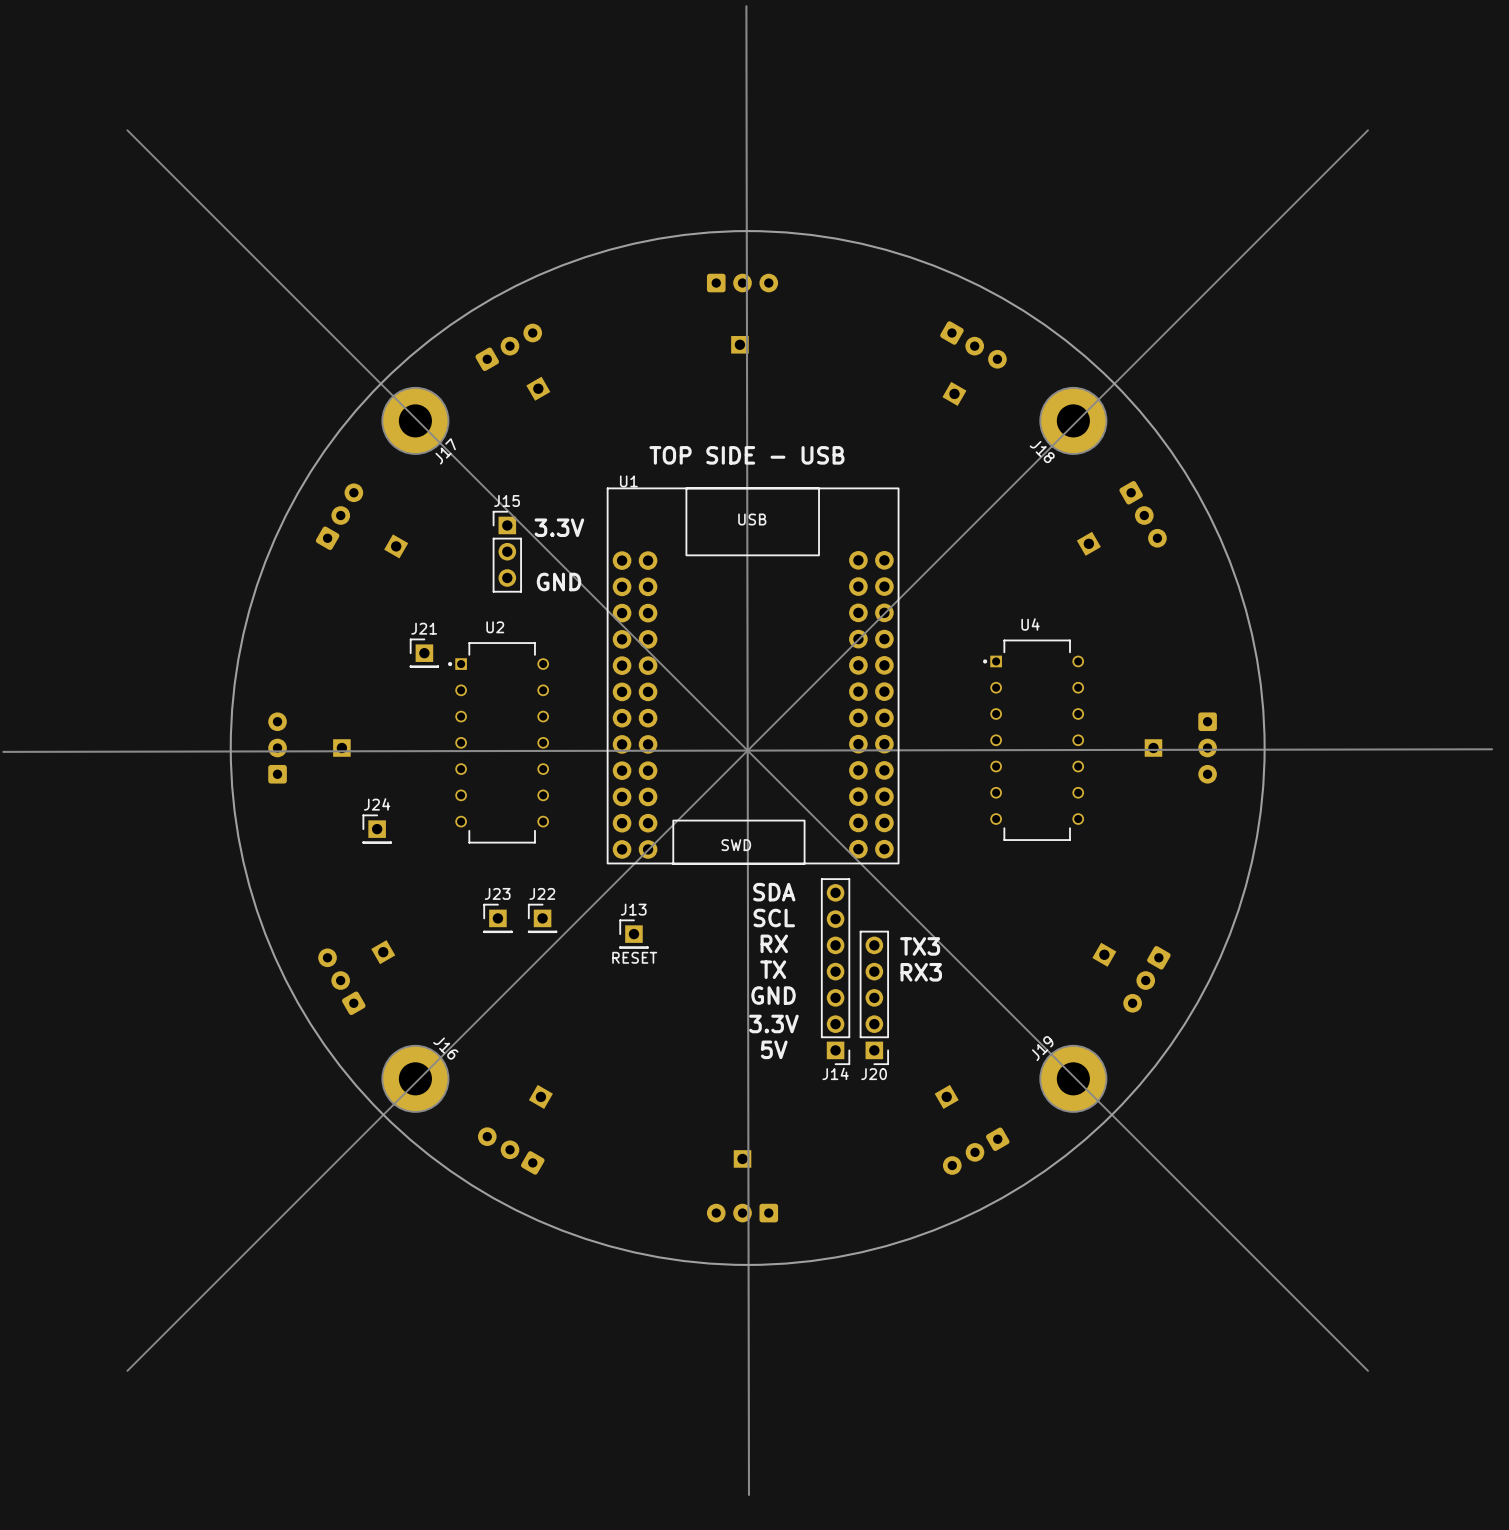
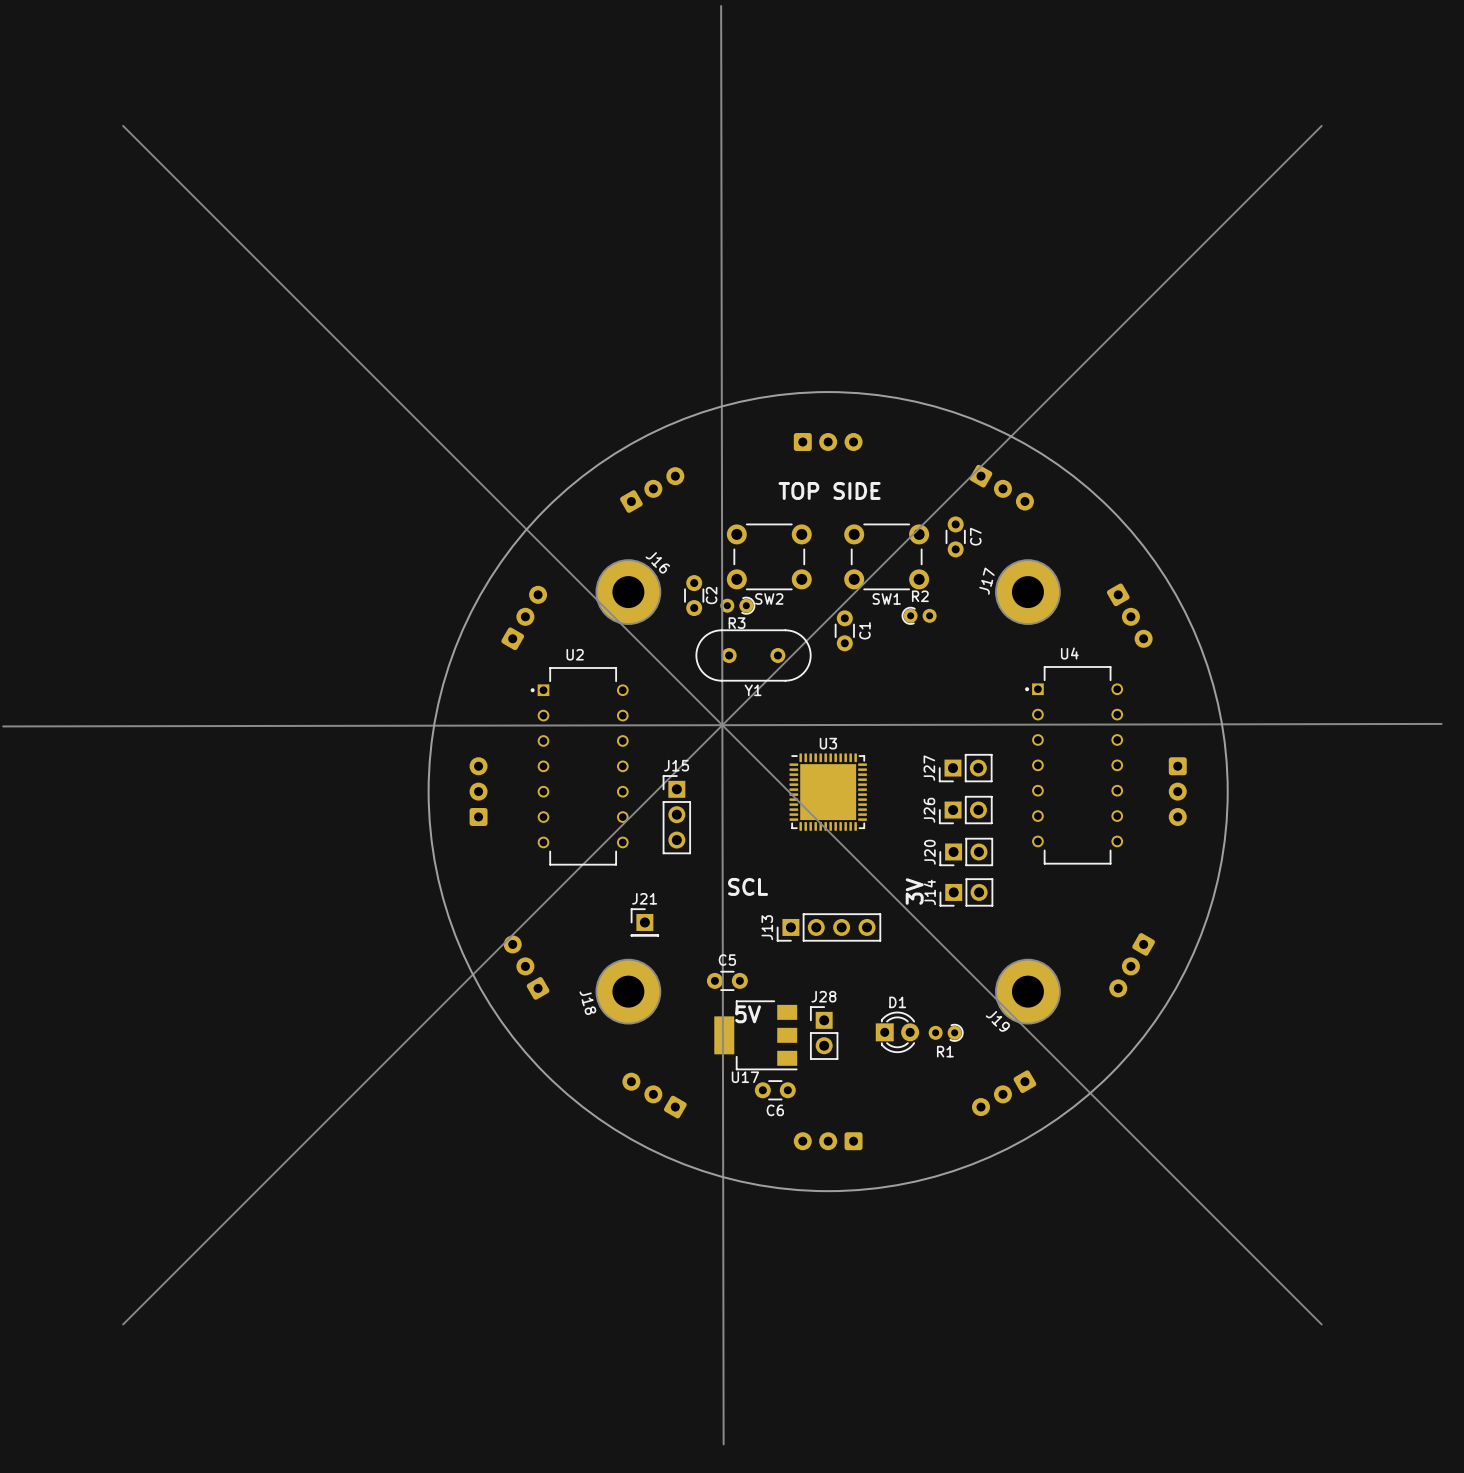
round board edge: [229, 230, 1266, 1266] -> none
part position: (742, 283) -> (828, 442)
part: (739, 344) -> none
part position: (973, 344) -> (1001, 487)
part position: (508, 347) -> (652, 490)
part: (538, 388) -> none
part: (954, 393) -> none
round board edge: none -> [427, 391, 1229, 1193]
J17 position: (415, 420) -> (1027, 592)
J18 position: (1073, 420) -> (628, 991)
J17 name rotation: 0° (445, 451) -> 30° counterclockwise (986, 581)
J17 name position: J17 (445, 451) -> J17 (986, 581)
J18 name rotation: 0° (1042, 452) -> 30° clockwise (587, 1003)
text: TOP SIDE - USB (746, 455) -> none
text: none -> TOP SIDE (829, 490)
part position: (1143, 514) -> (1129, 615)
part position: (339, 516) -> (524, 617)
text: 3.3V (559, 527) -> none
part: (1088, 543) -> none
part: (396, 546) -> none
J15 position: (507, 551) -> (676, 814)
C7: none -> (955, 536)
SW2: none -> (769, 556)
SW1: none -> (886, 556)
text: GND (559, 582) -> none
C2: none -> (694, 595)
R3: none -> (737, 605)
R2: none -> (919, 615)
U4 footprint: [983, 639, 1085, 841] -> [1025, 666, 1124, 865]
U2 footprint: [448, 642, 550, 844] -> [530, 667, 629, 866]
C1: none -> (844, 630)
J21 position: (424, 653) -> (644, 922)
U1: (753, 676) -> none
Y1: none -> (753, 655)
part position: (277, 748) -> (478, 791)
part: (341, 748) -> none
part: (1153, 748) -> none
part position: (1207, 748) -> (1177, 791)
J27: none -> (965, 768)
U3: none -> (828, 792)
J24: (377, 829) -> none
J26: none -> (965, 810)
J14 footprint: [821, 878, 850, 1065] -> [939, 878, 993, 907]
text: SDA (774, 892) -> none
J13 name position: J13 (633, 909) -> J13 (767, 927)
J23: (497, 918) -> none
J22: (542, 918) -> none
J13 footprint: [619, 919, 649, 949] -> [777, 913, 881, 942]
text: none -> 3V (914, 891)
J20 footprint: [859, 930, 889, 1065] -> [939, 838, 993, 866]
text: RX (774, 943) -> none
text: TX3 (920, 946) -> none
part: (383, 952) -> none
part: (1104, 954) -> none
J13 value: RESET (634, 957) -> none
text: TX (773, 969) -> none
text: RX3 (921, 972) -> none
part position: (1146, 979) -> (1132, 965)
part position: (341, 981) -> (526, 967)
text: GND (773, 995) -> none
C5: none -> (727, 980)
text: 3.3V (773, 1023) -> none
J19 name rotation: 0° (1042, 1048) -> 90° clockwise (997, 1021)
D1: none -> (897, 1032)
J28: none -> (824, 1033)
R1: none -> (946, 1032)
U17: none -> (755, 1035)
J14 name position: J14 (835, 1073) -> J14 (929, 892)
J20 name position: J20 (874, 1074) -> J20 (929, 852)
J16 position: (415, 1078) -> (628, 592)
J19 position: (1073, 1078) -> (1027, 991)
part: (540, 1096) -> none
part: (946, 1096) -> none
C6: none -> (775, 1090)
part position: (511, 1151) -> (654, 1095)
part position: (976, 1151) -> (1004, 1093)
part: (742, 1158) -> none
part position: (742, 1213) -> (828, 1141)

